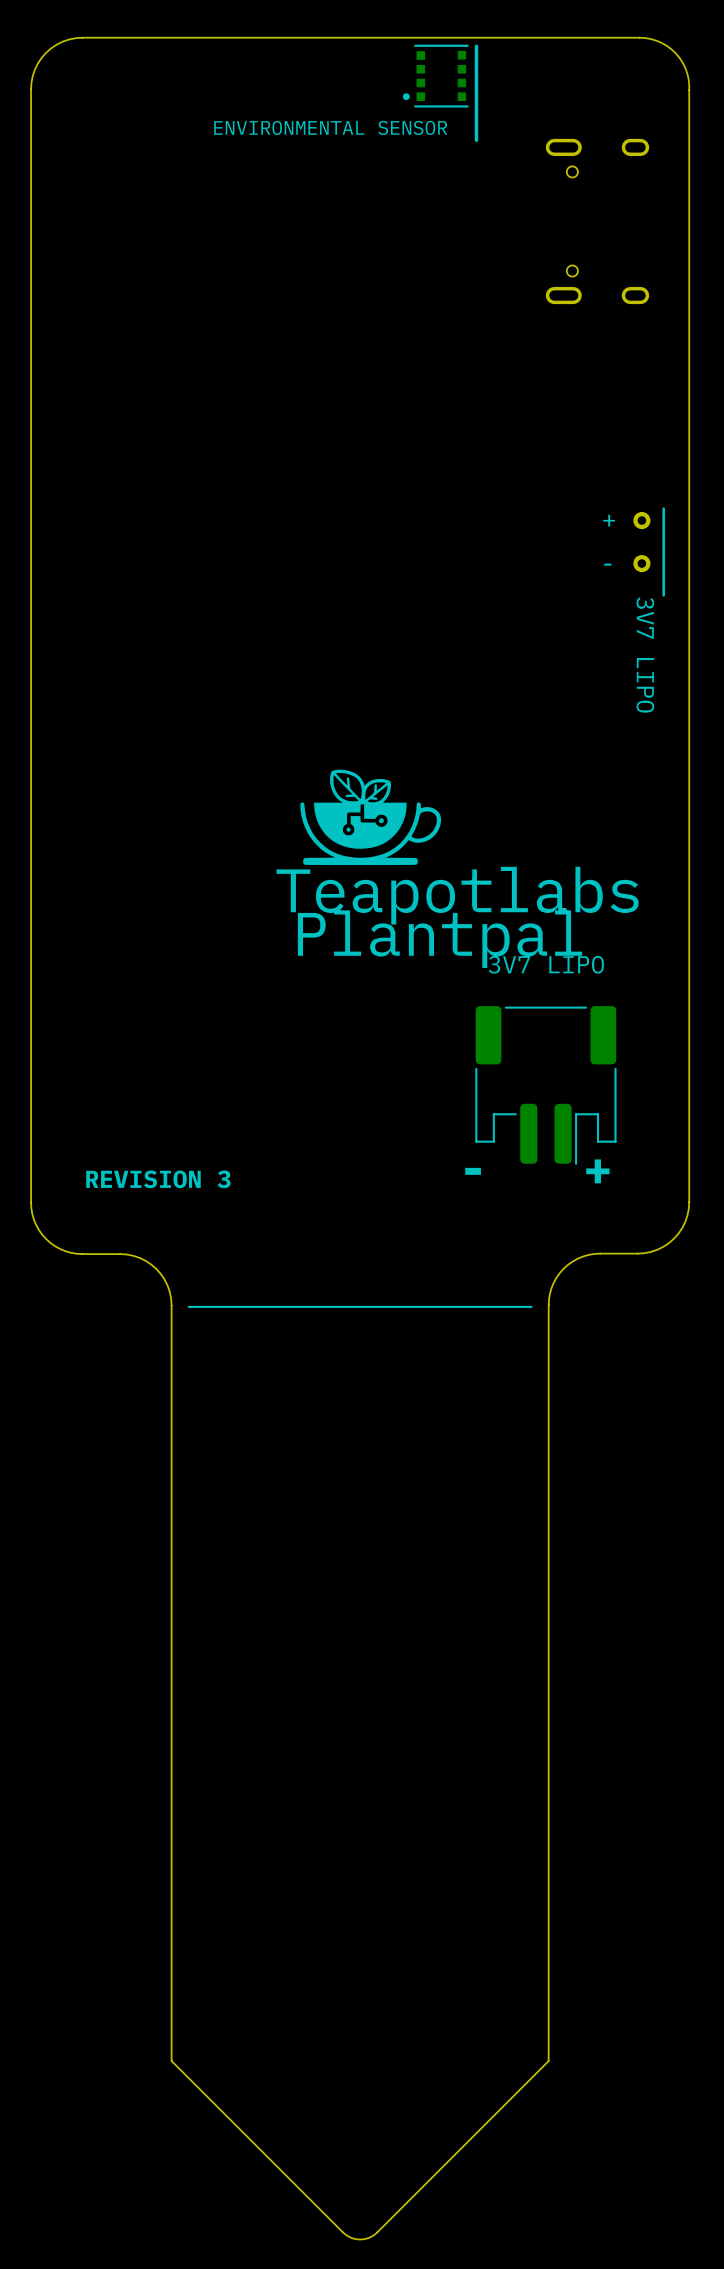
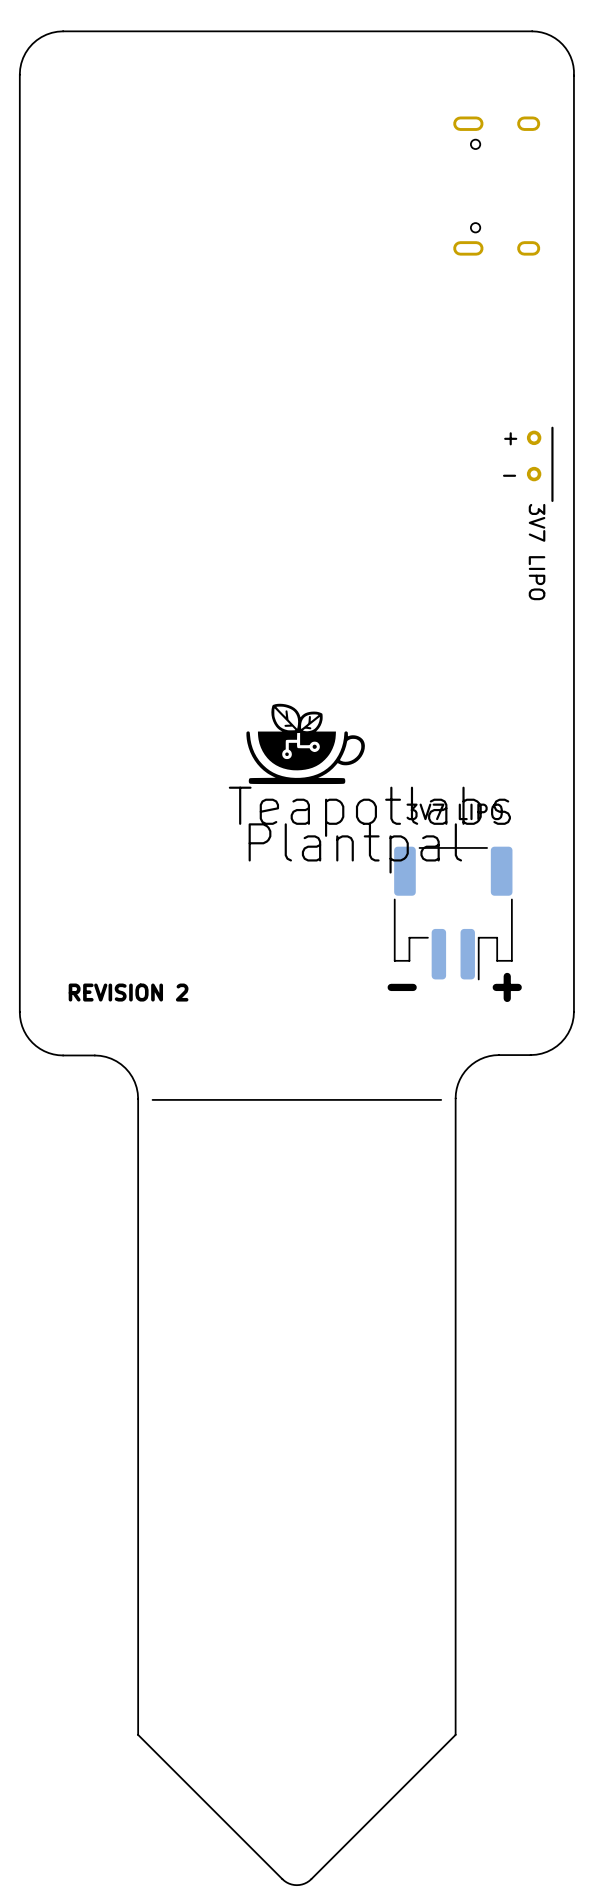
line: (476, 46) (476, 140) -> none
part: (435, 76) -> none
text: ENVIRONMENTAL SENSOR (330, 127) -> none
drawing position: (370, 817) -> (305, 743)
text position: Teapotlabs (457, 895) -> Teapotlabs (369, 811)
text position: Plantpal (440, 939) -> Plantpal (355, 848)
text: REVISION 3 (158, 1179) -> REVISION 2 (128, 992)

